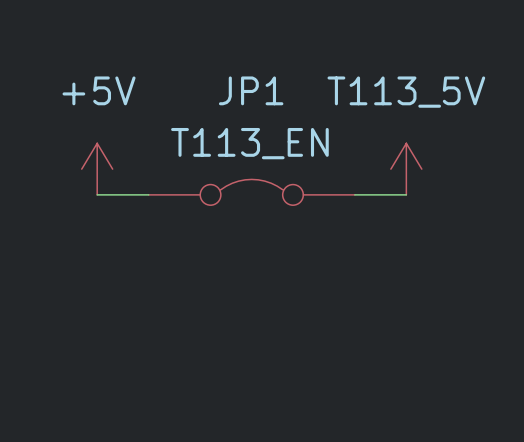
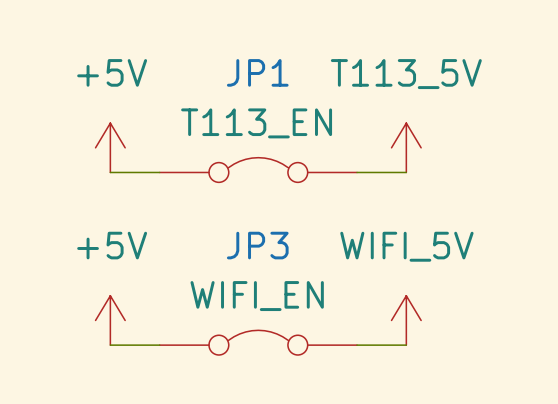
power symbol: none -> +5V (110, 320)
power symbol: none -> WIFI_5V (406, 320)
JP3: none -> WIFI_EN (258, 342)
wire: none -> (110, 345) (159, 345)
wire: none -> (357, 345) (406, 345)

